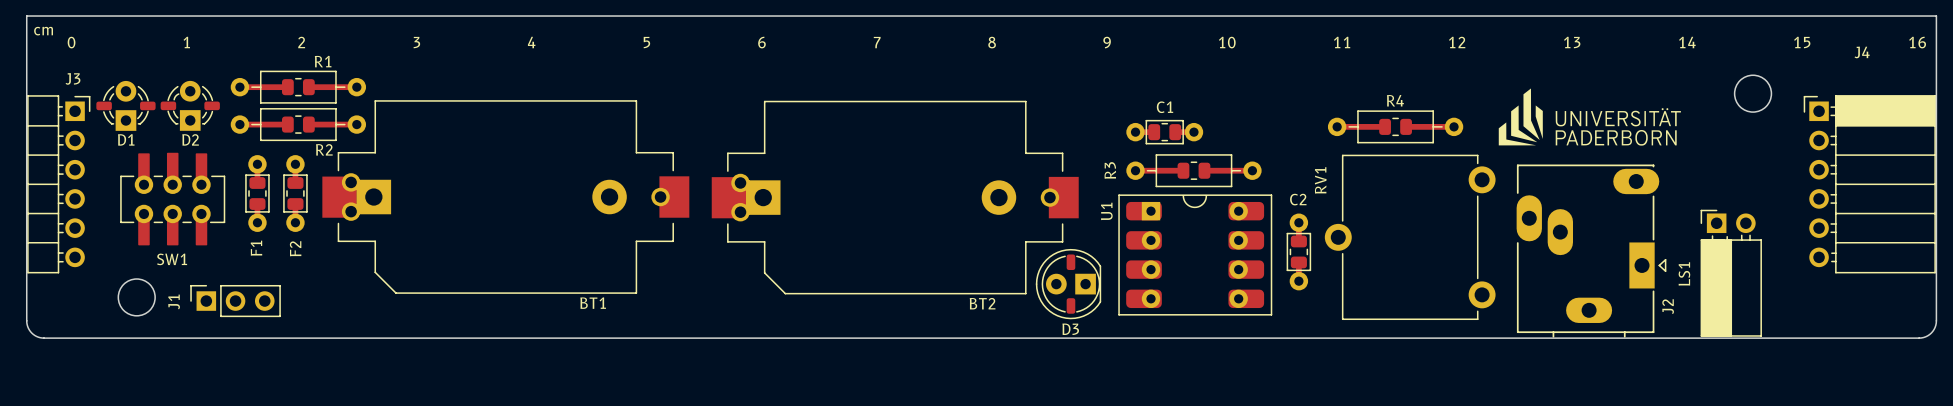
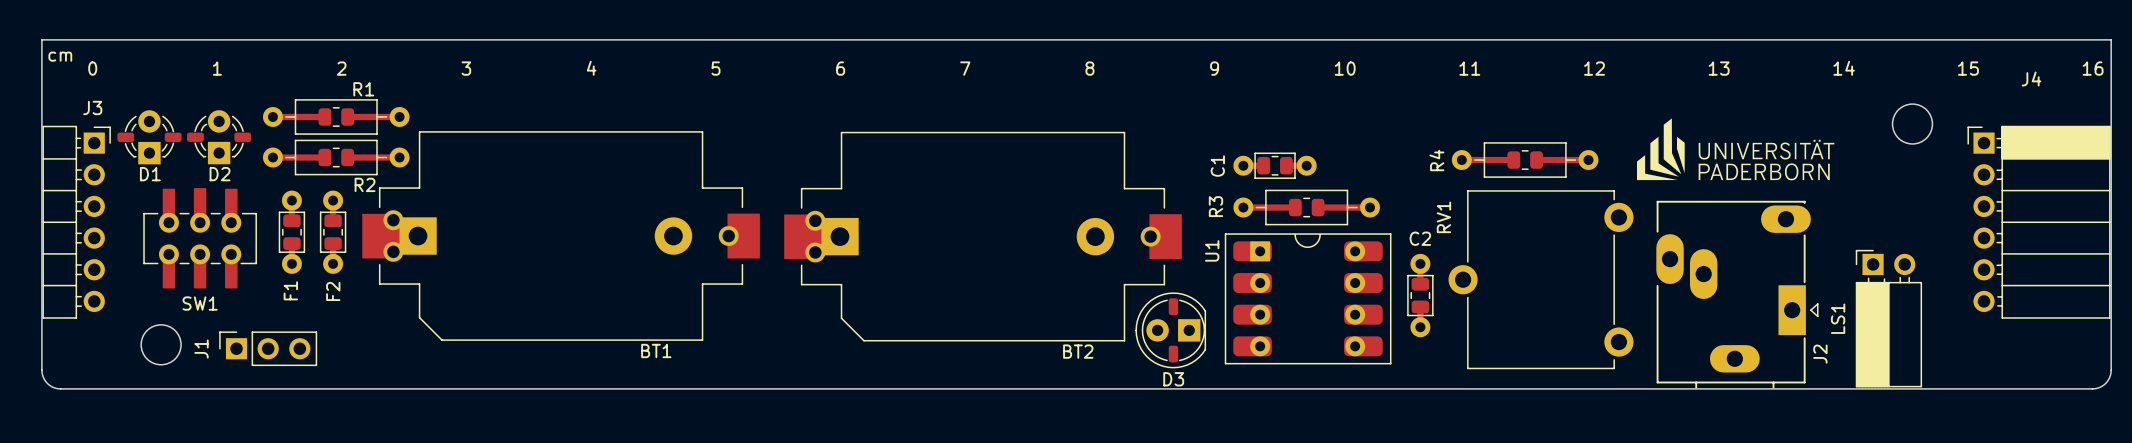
R4 name rotation: 0° (1395, 100) -> 90° counterclockwise (1436, 160)
R4 name position: R4 (1395, 100) -> R4 (1436, 160)
C1 name rotation: 0° (1165, 107) -> 90° counterclockwise (1217, 166)
C1 name position: C1 (1165, 107) -> C1 (1217, 166)

